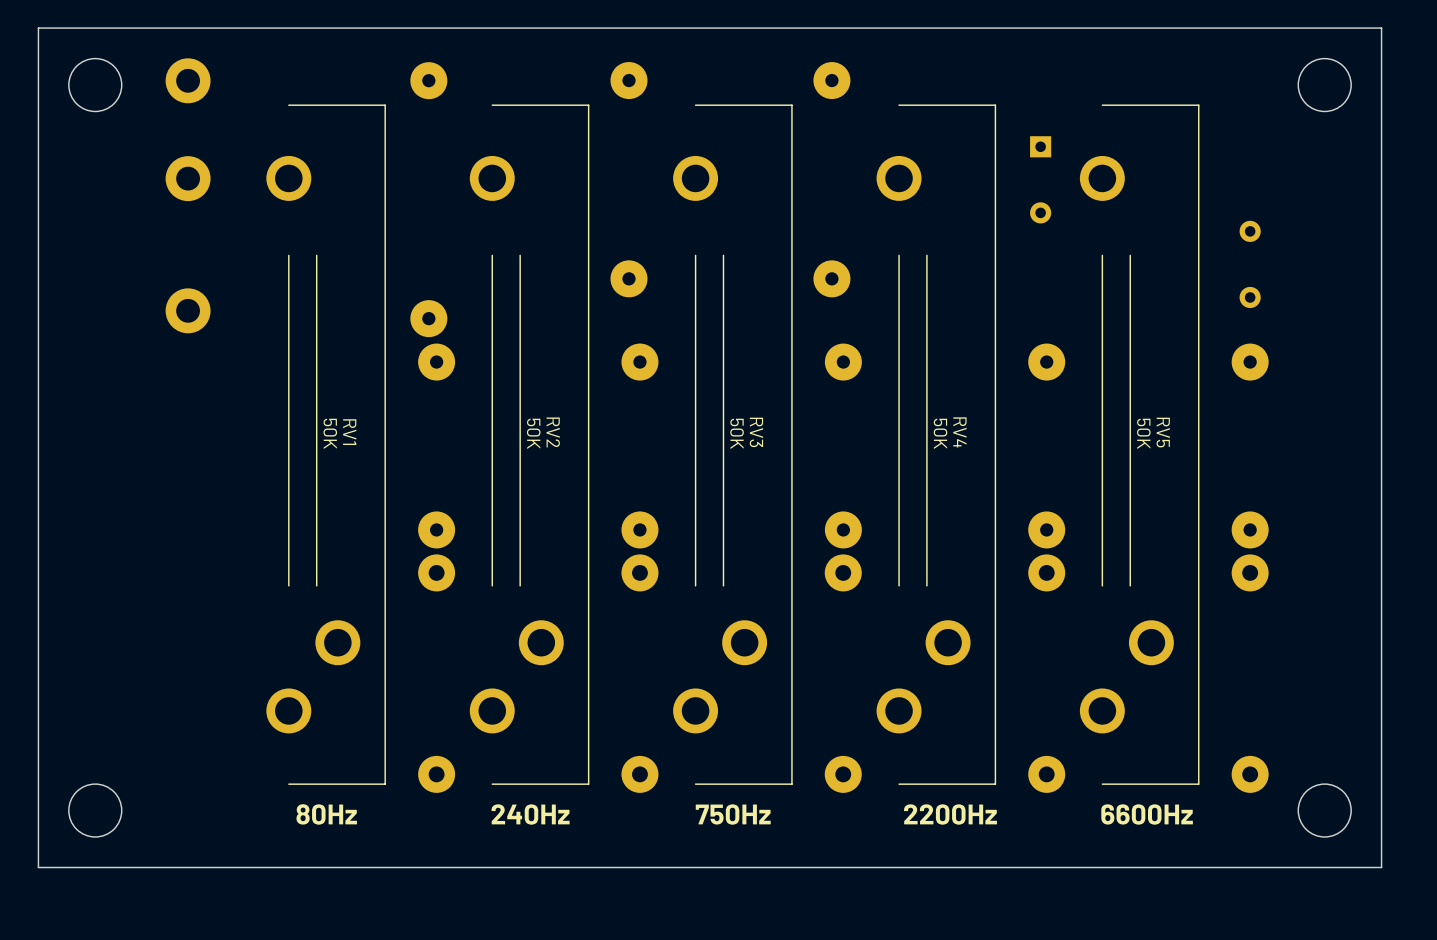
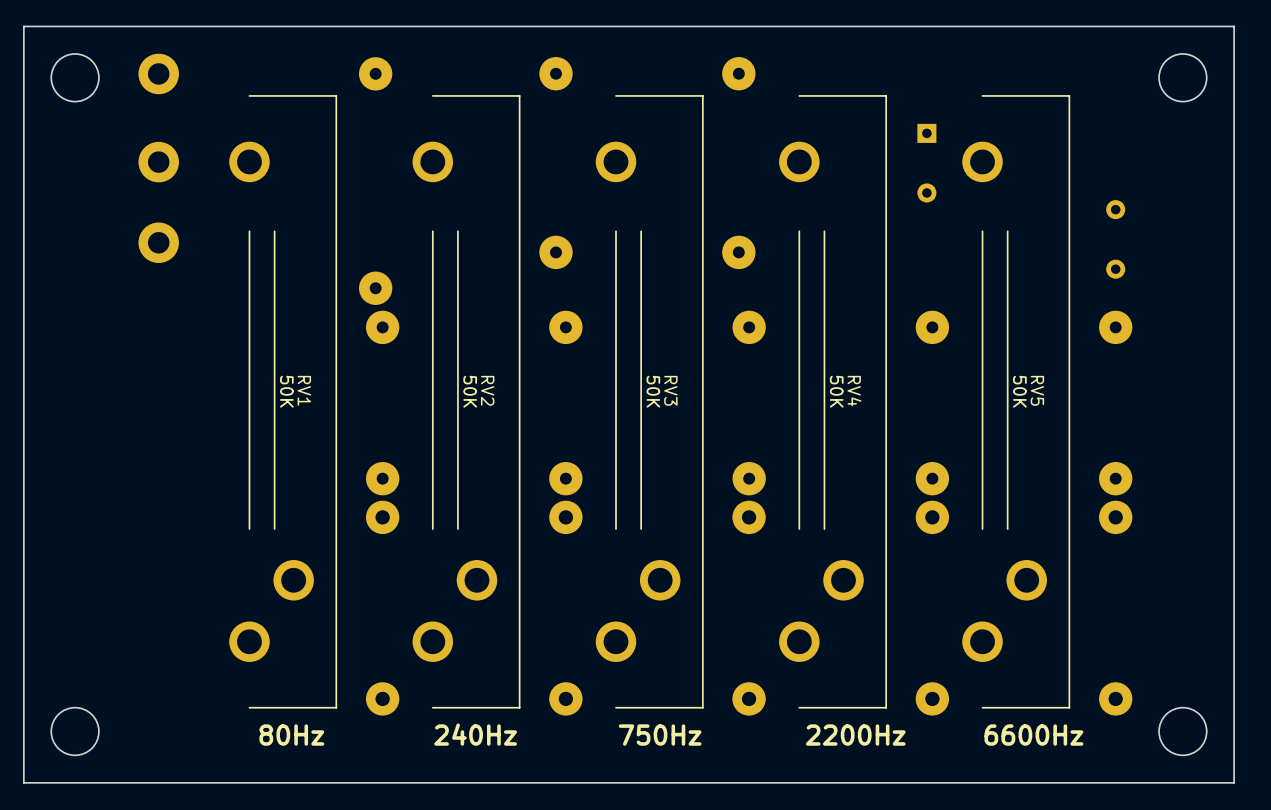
part position: (188, 310) -> (158, 242)

